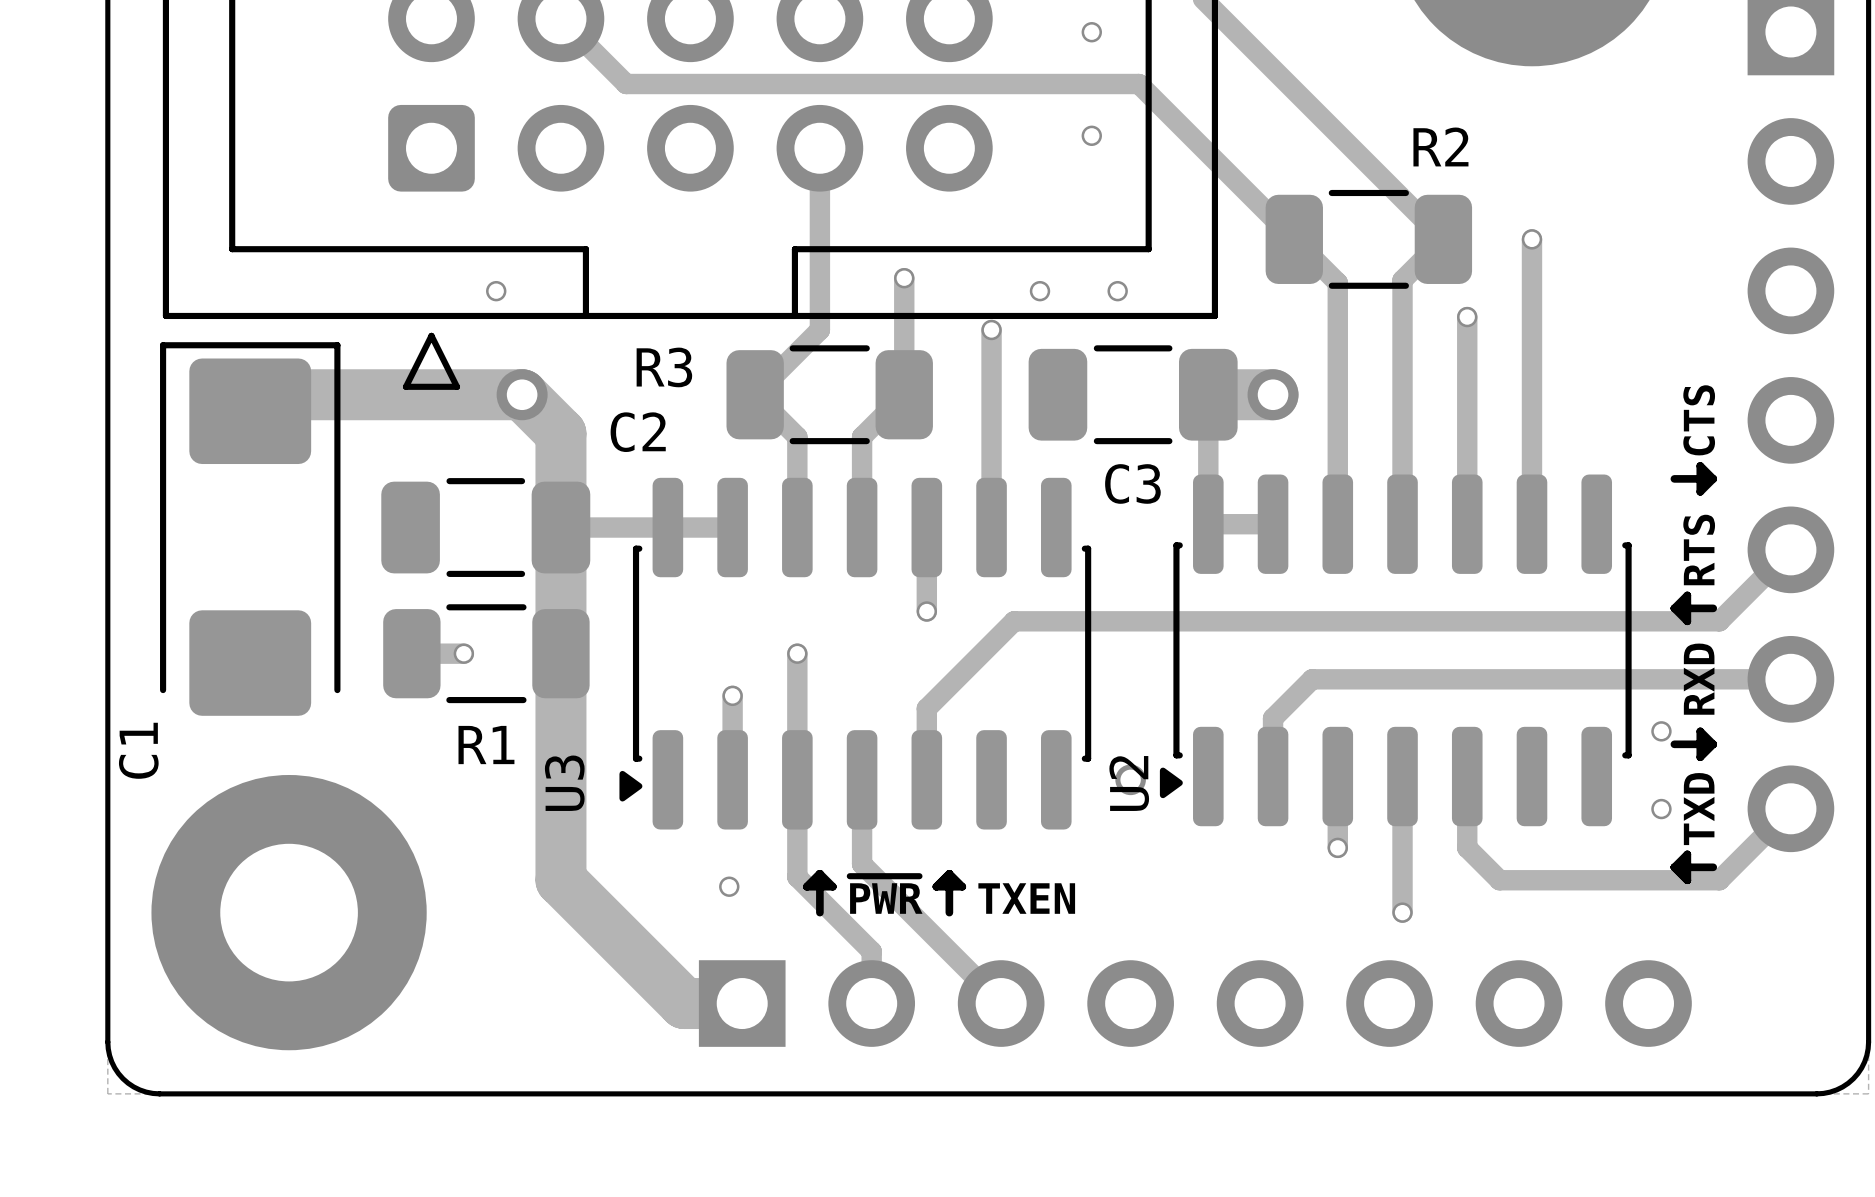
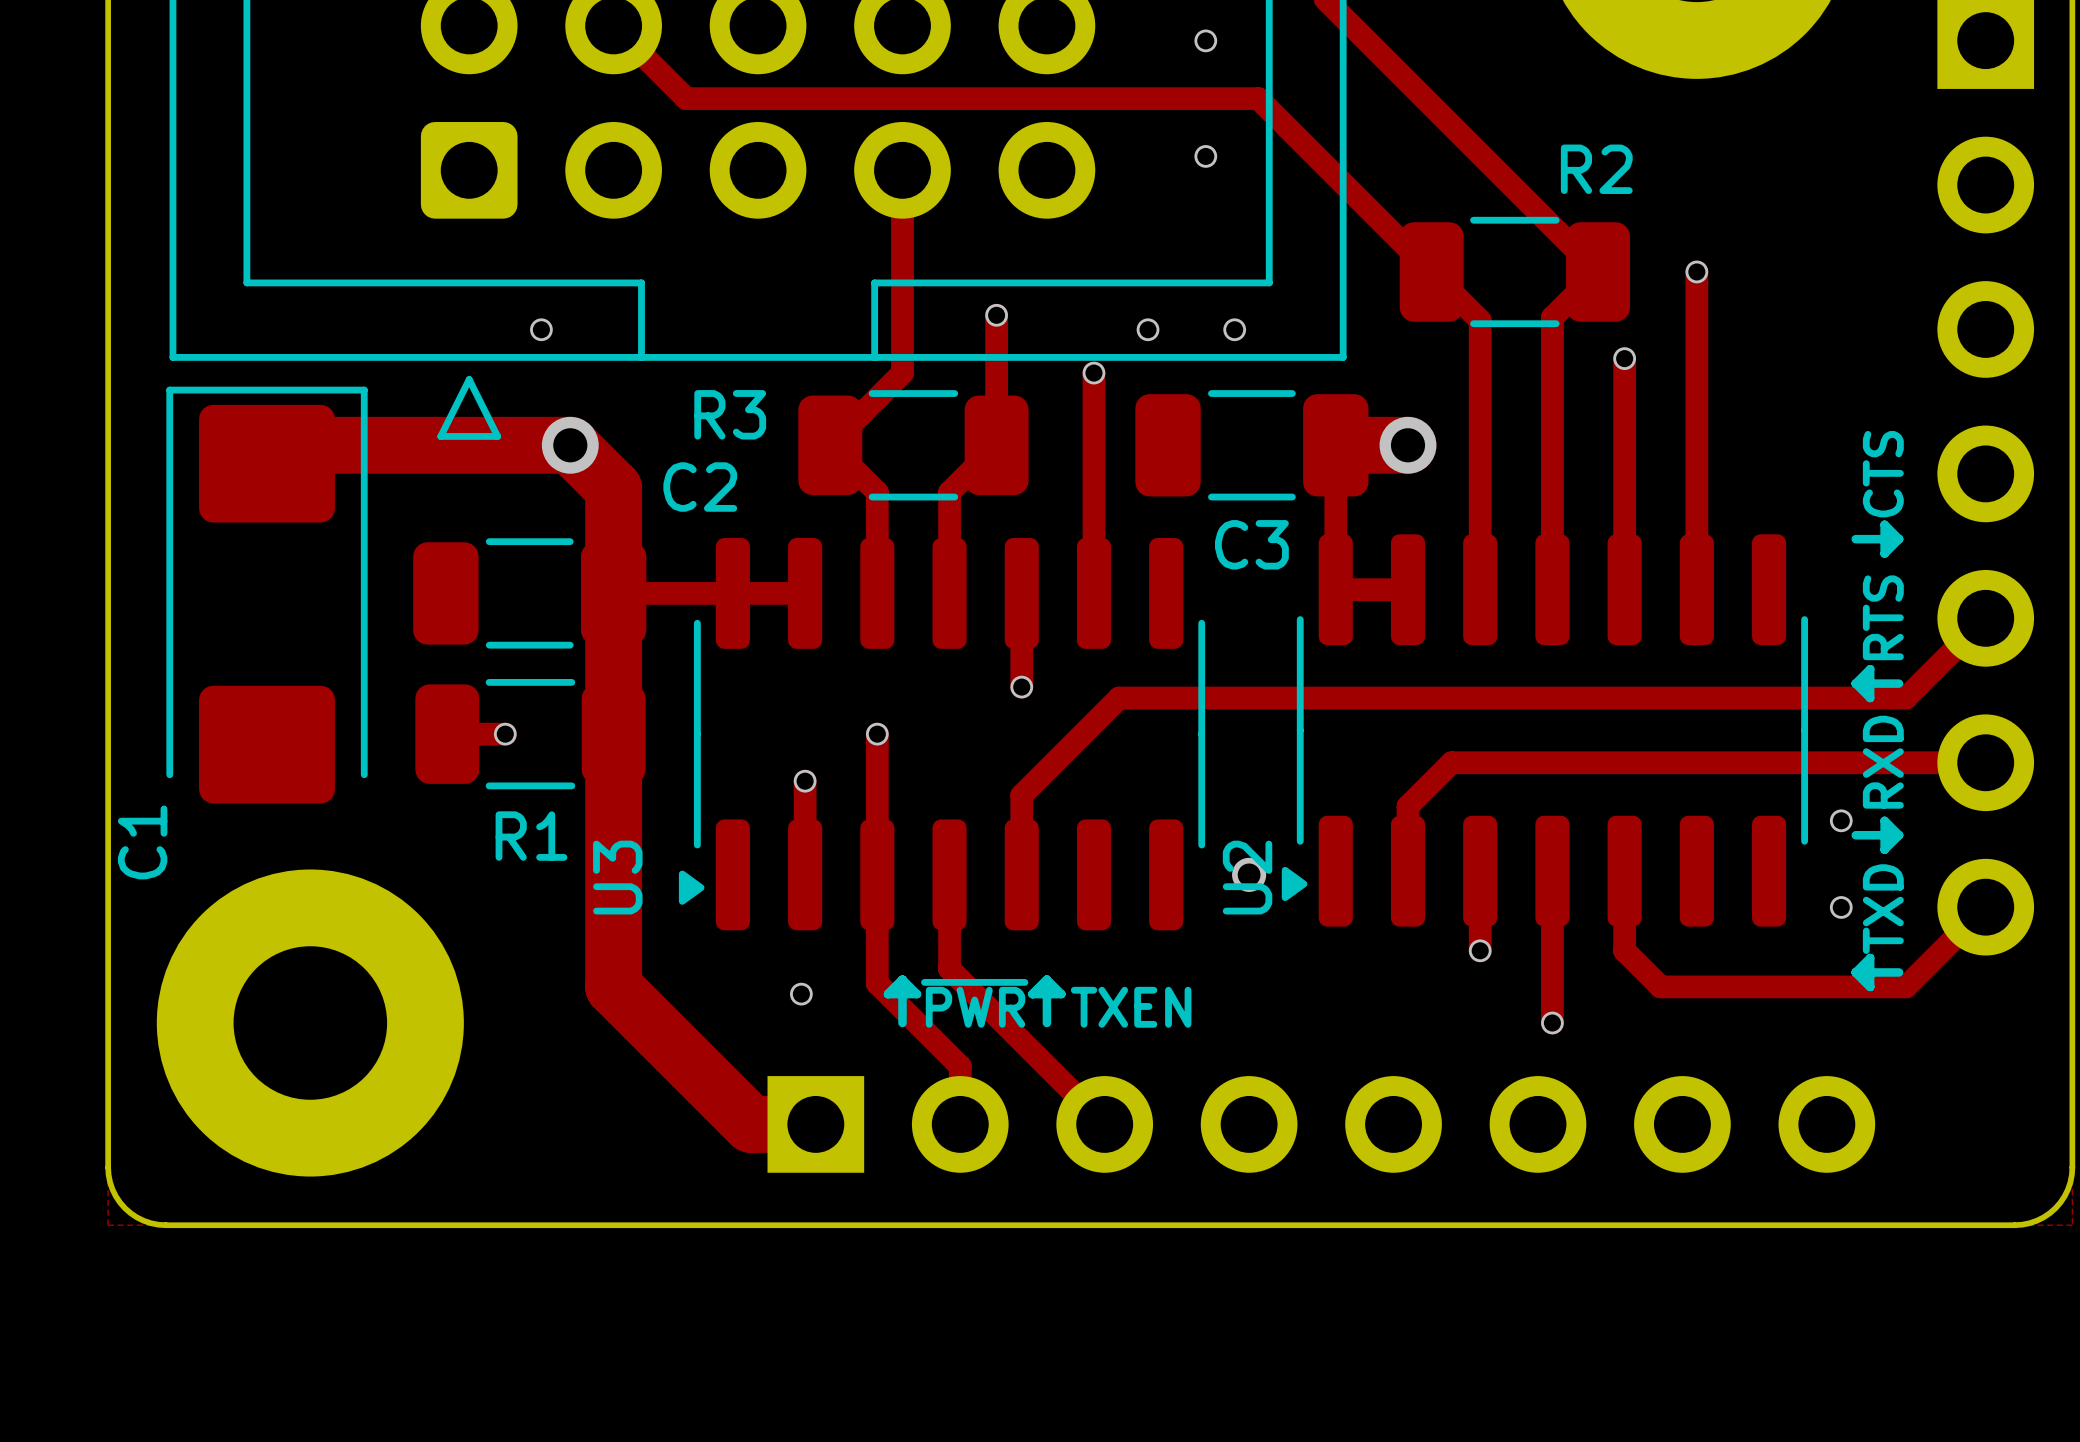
U2 footprint: [1159, 474, 1632, 827] -> [1281, 534, 1809, 927]
U3 footprint: [619, 477, 1092, 830] -> [678, 537, 1206, 931]

